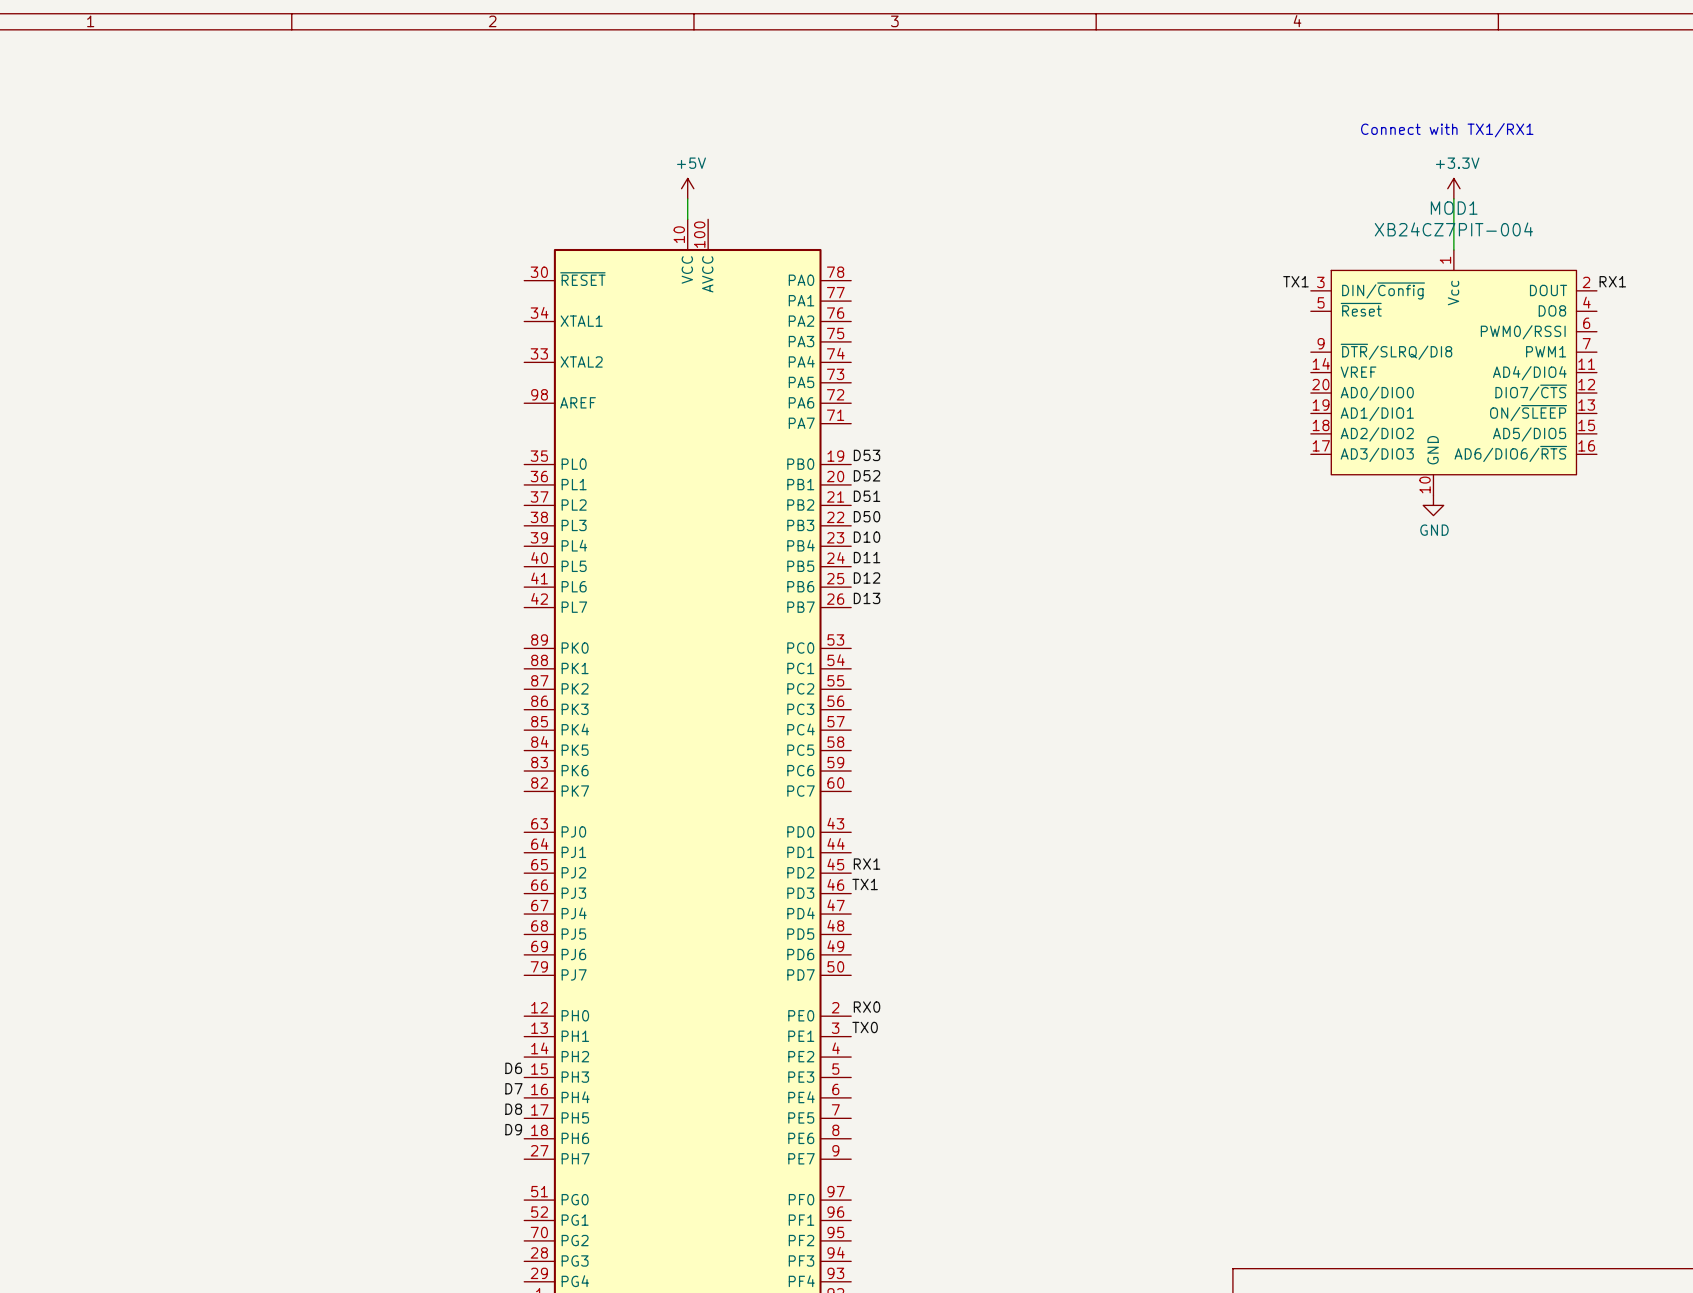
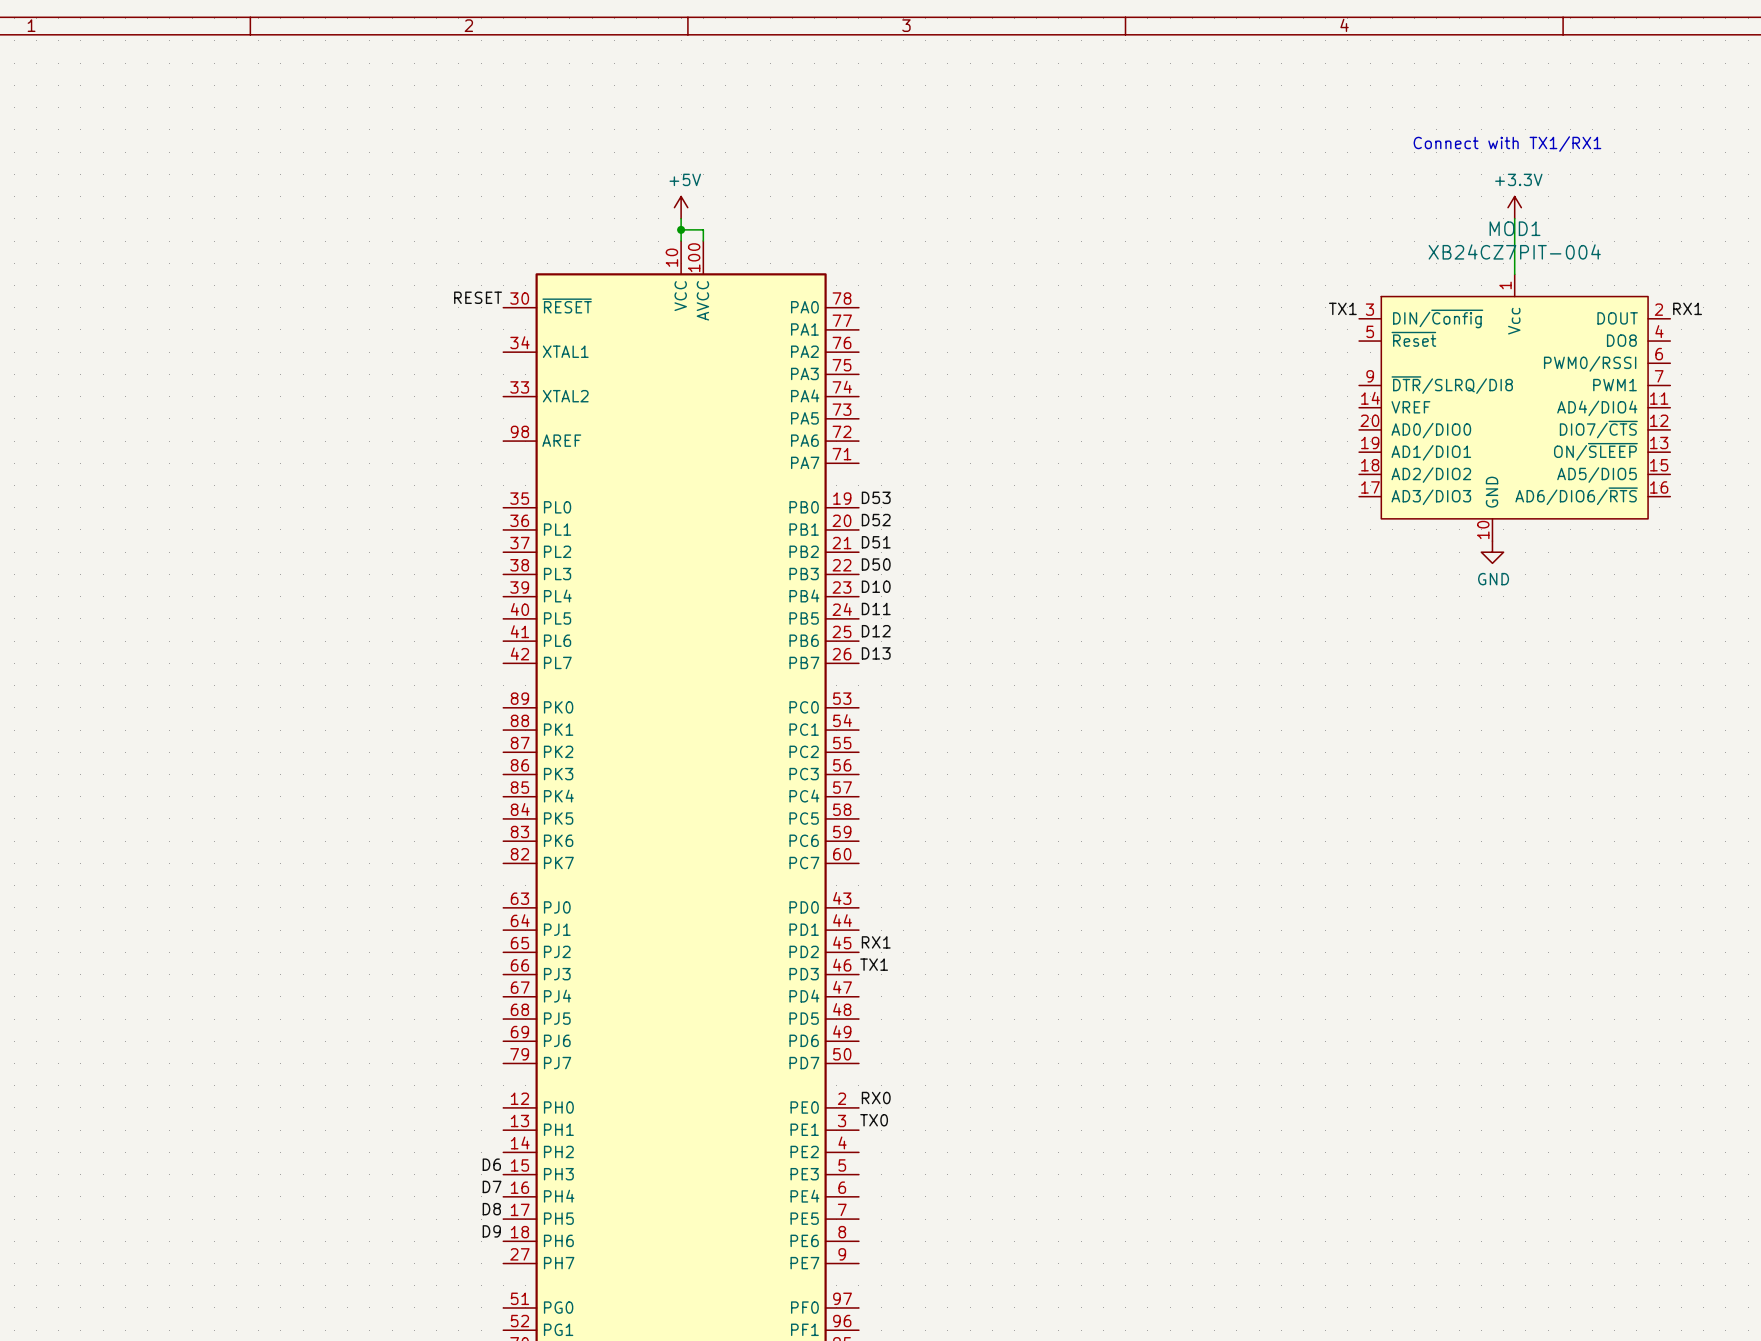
wire: none -> (681, 229) (703, 229) (703, 241)
junction: none -> (681, 229)
label: none -> RESET (478, 297)

